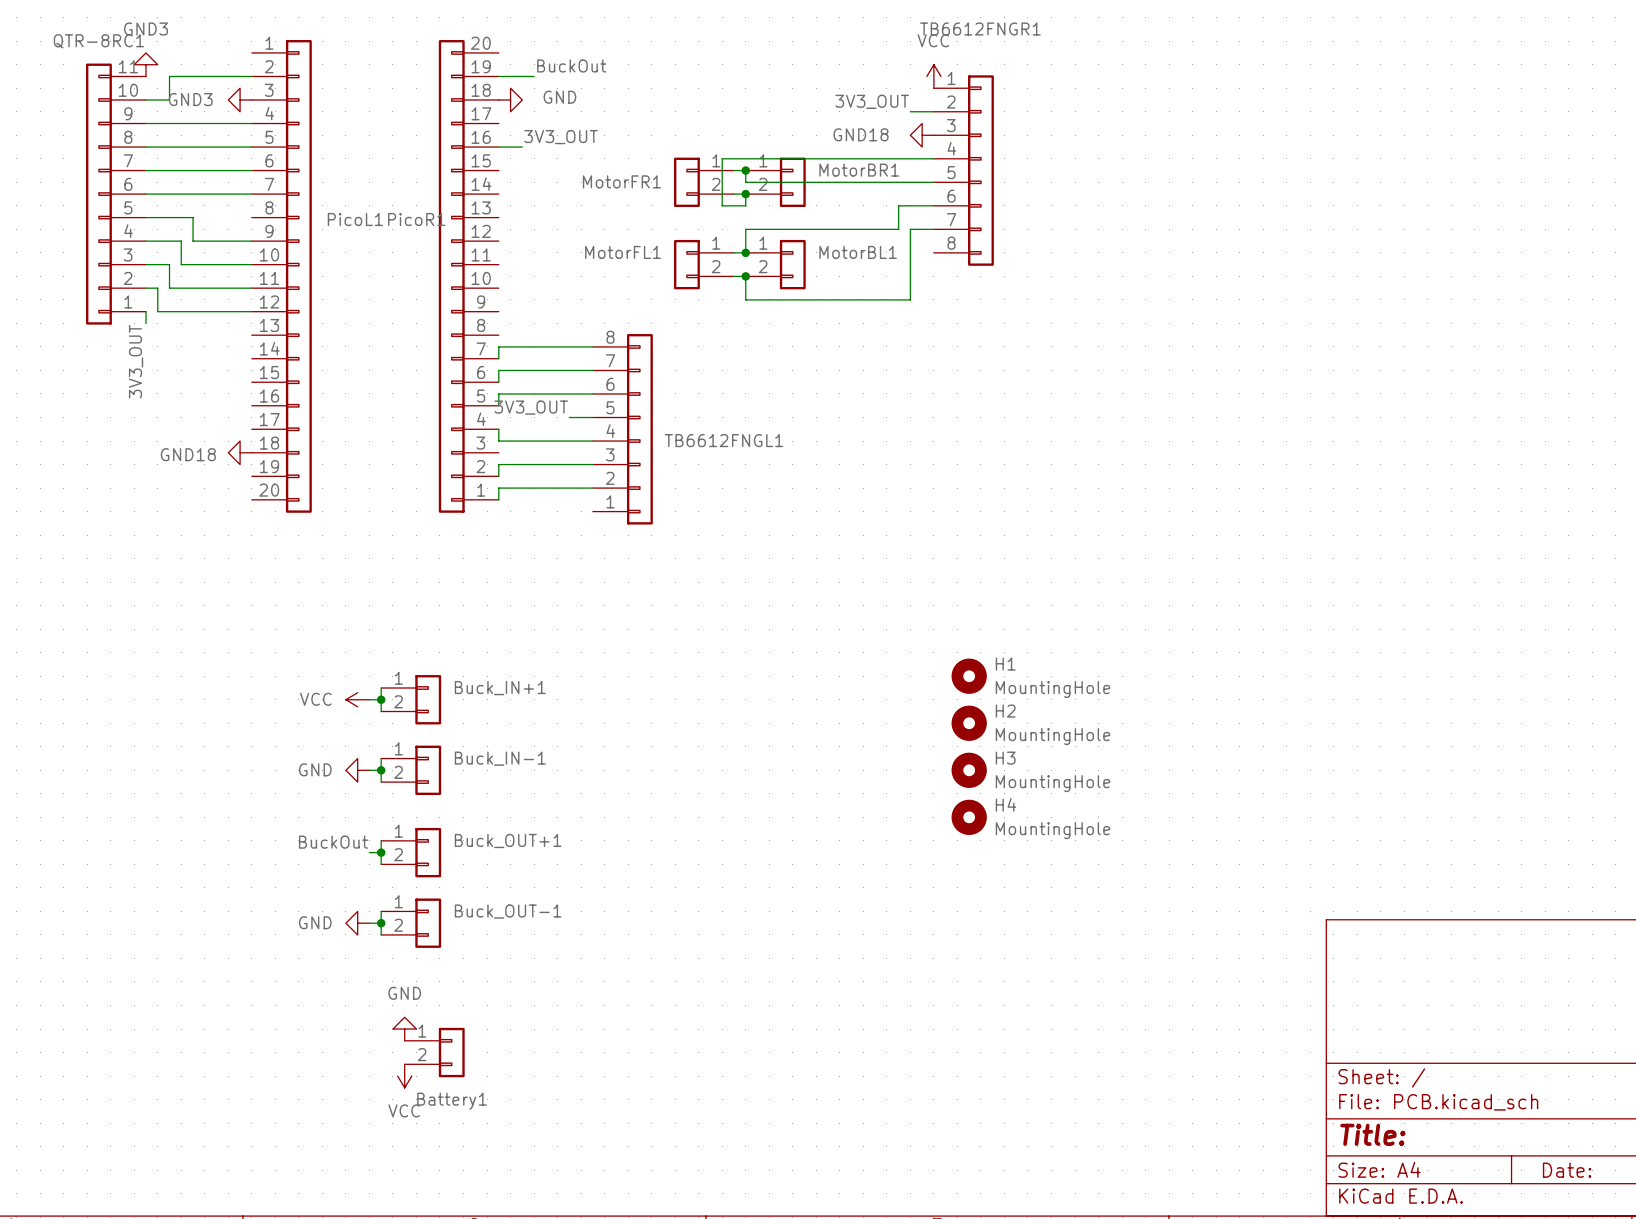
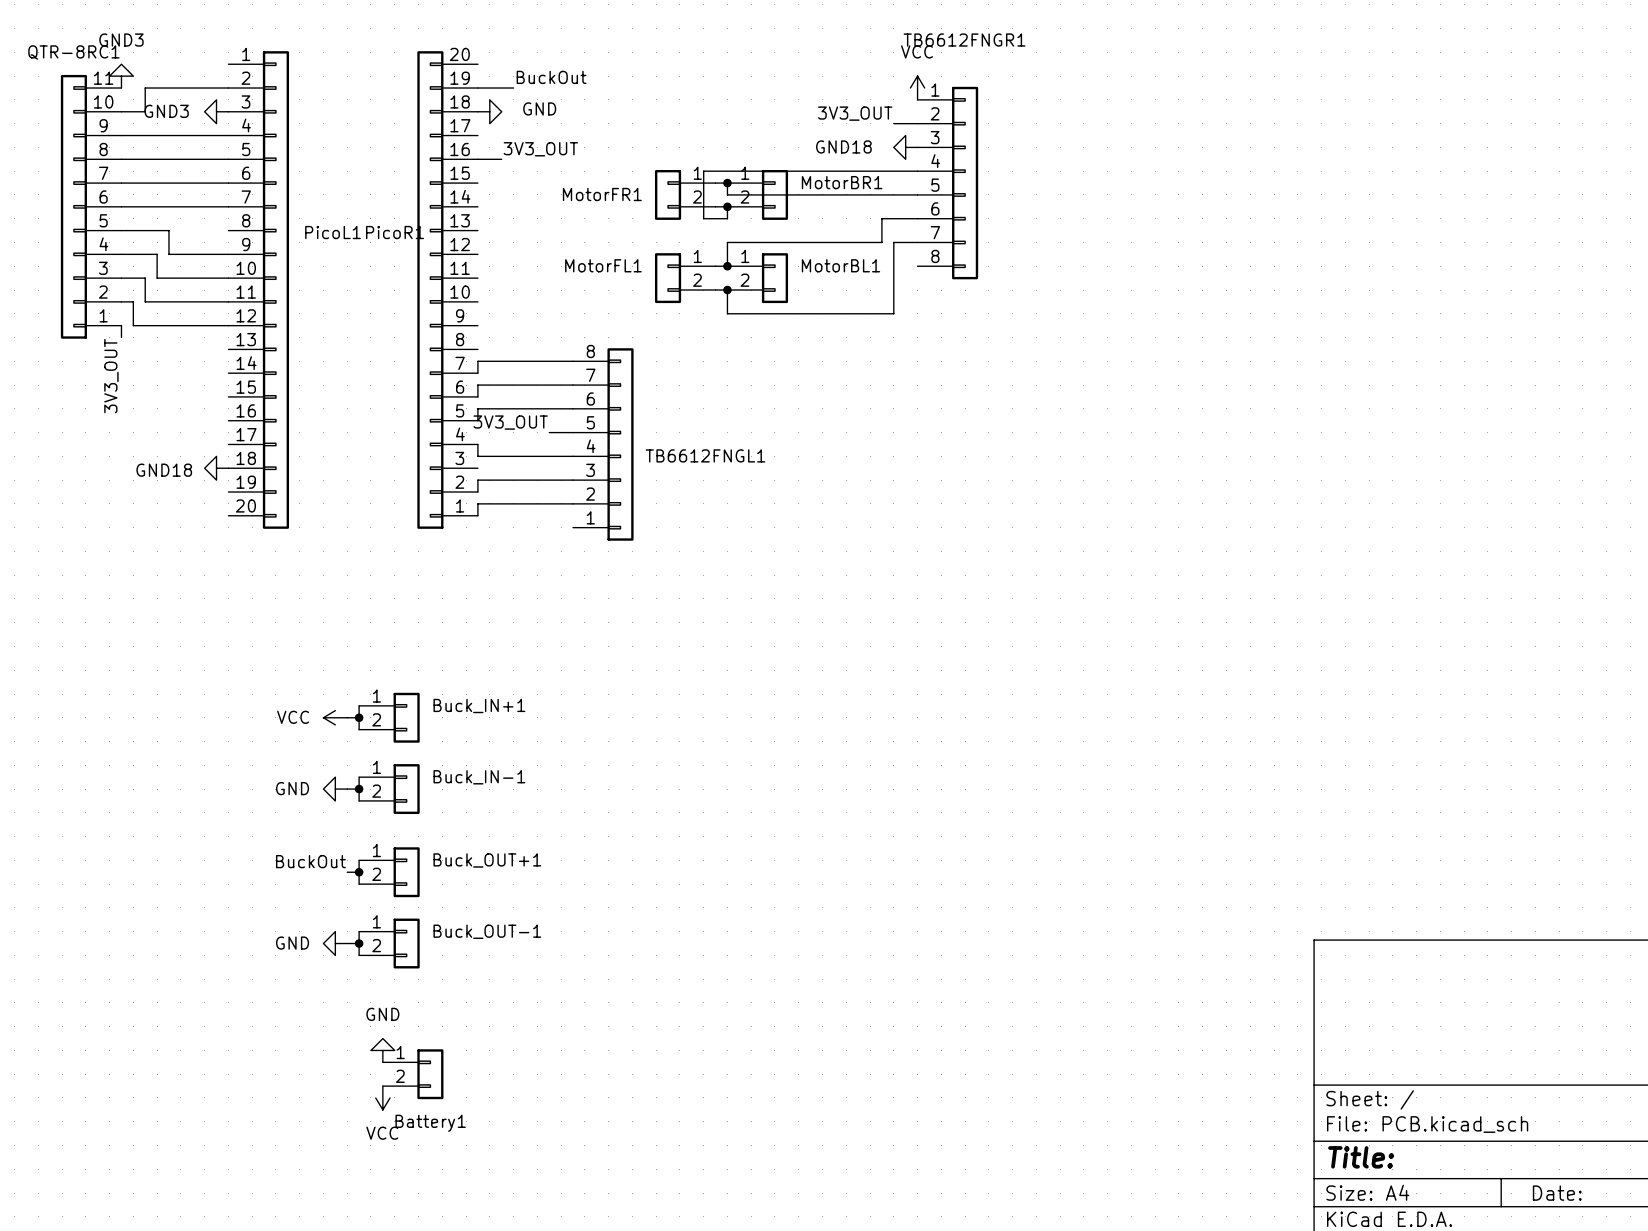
H1: MountingHole (969, 676) -> none
H2: MountingHole (969, 723) -> none
H3: MountingHole (969, 770) -> none
H4: MountingHole (969, 817) -> none

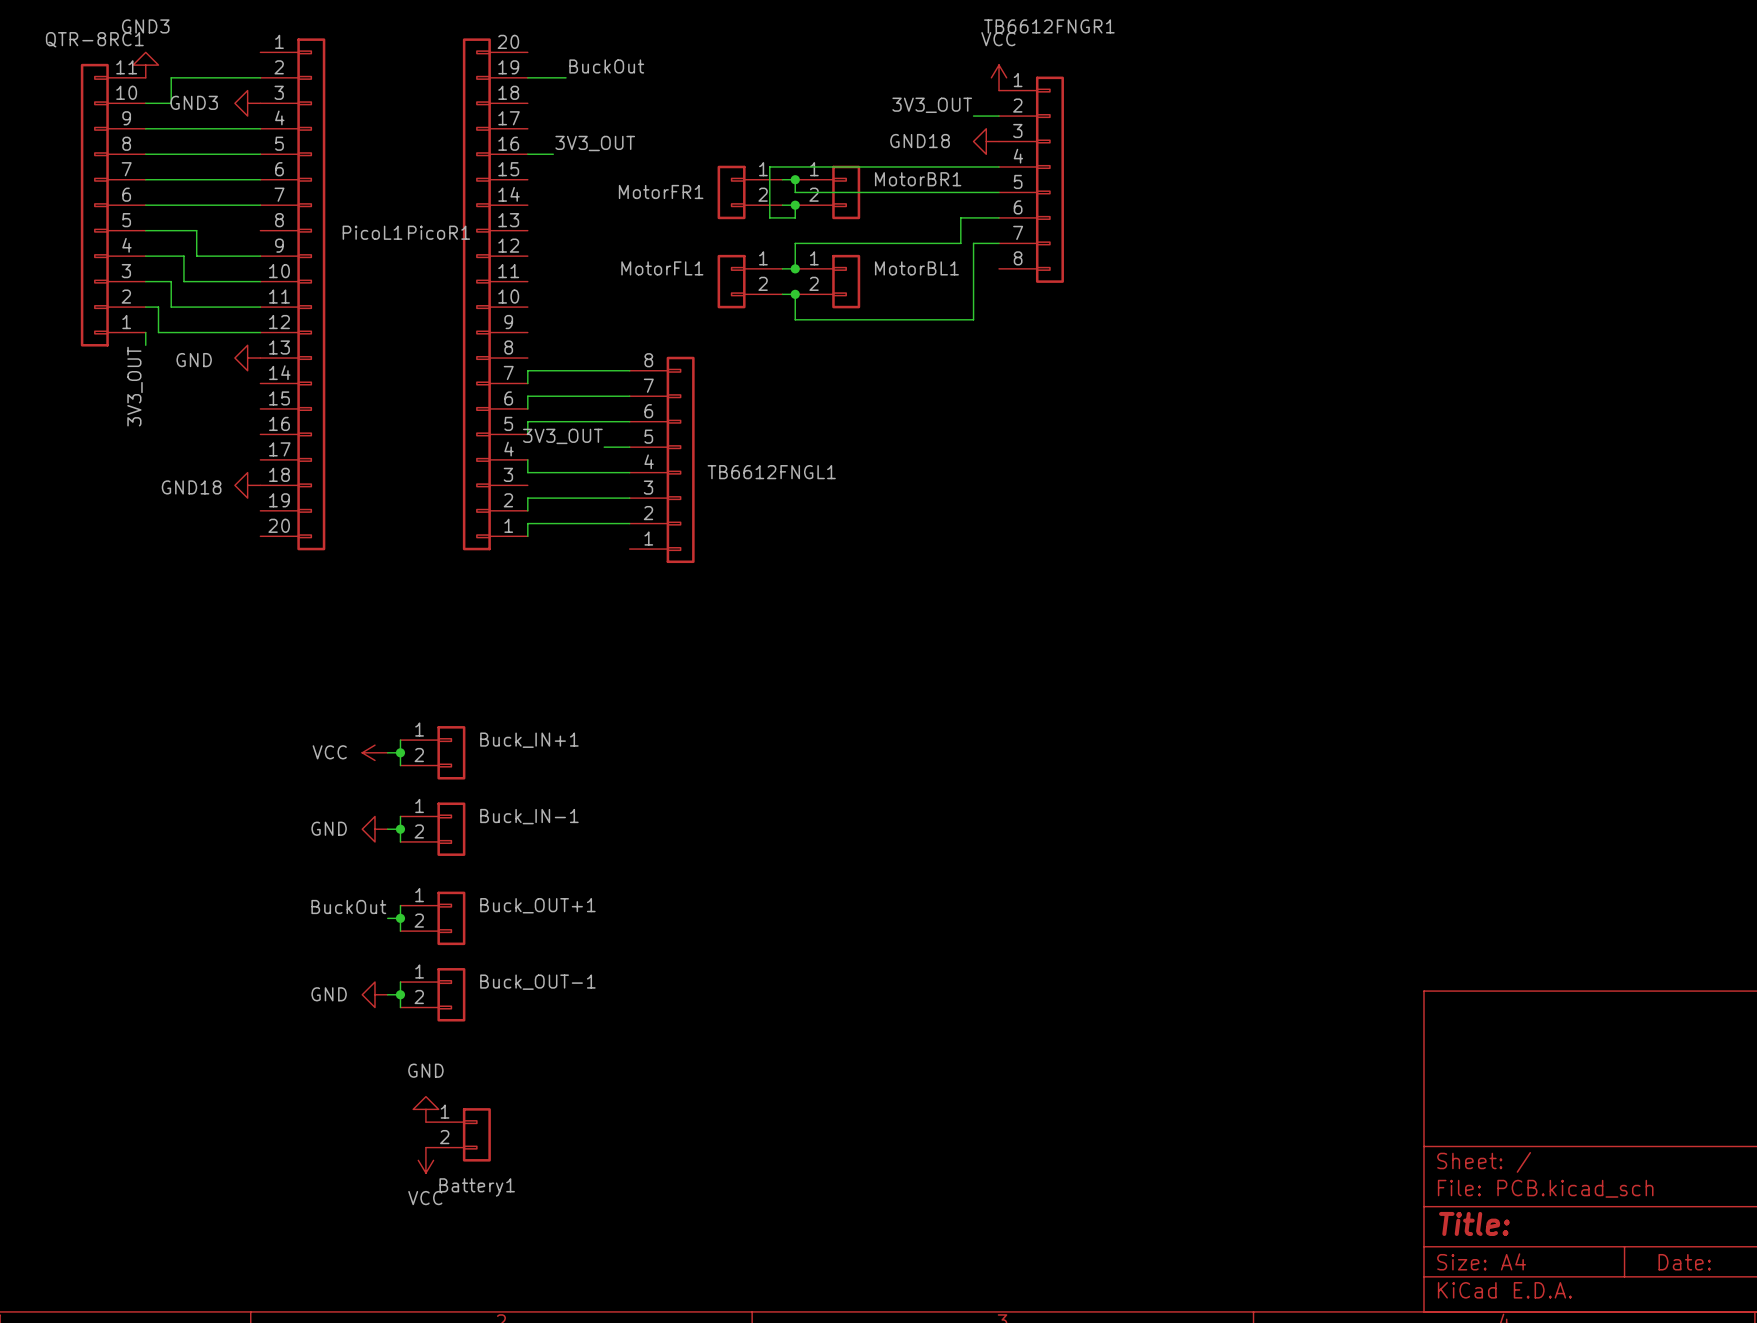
power symbol: GND (489, 111) -> none
power symbol: none -> GND (247, 358)

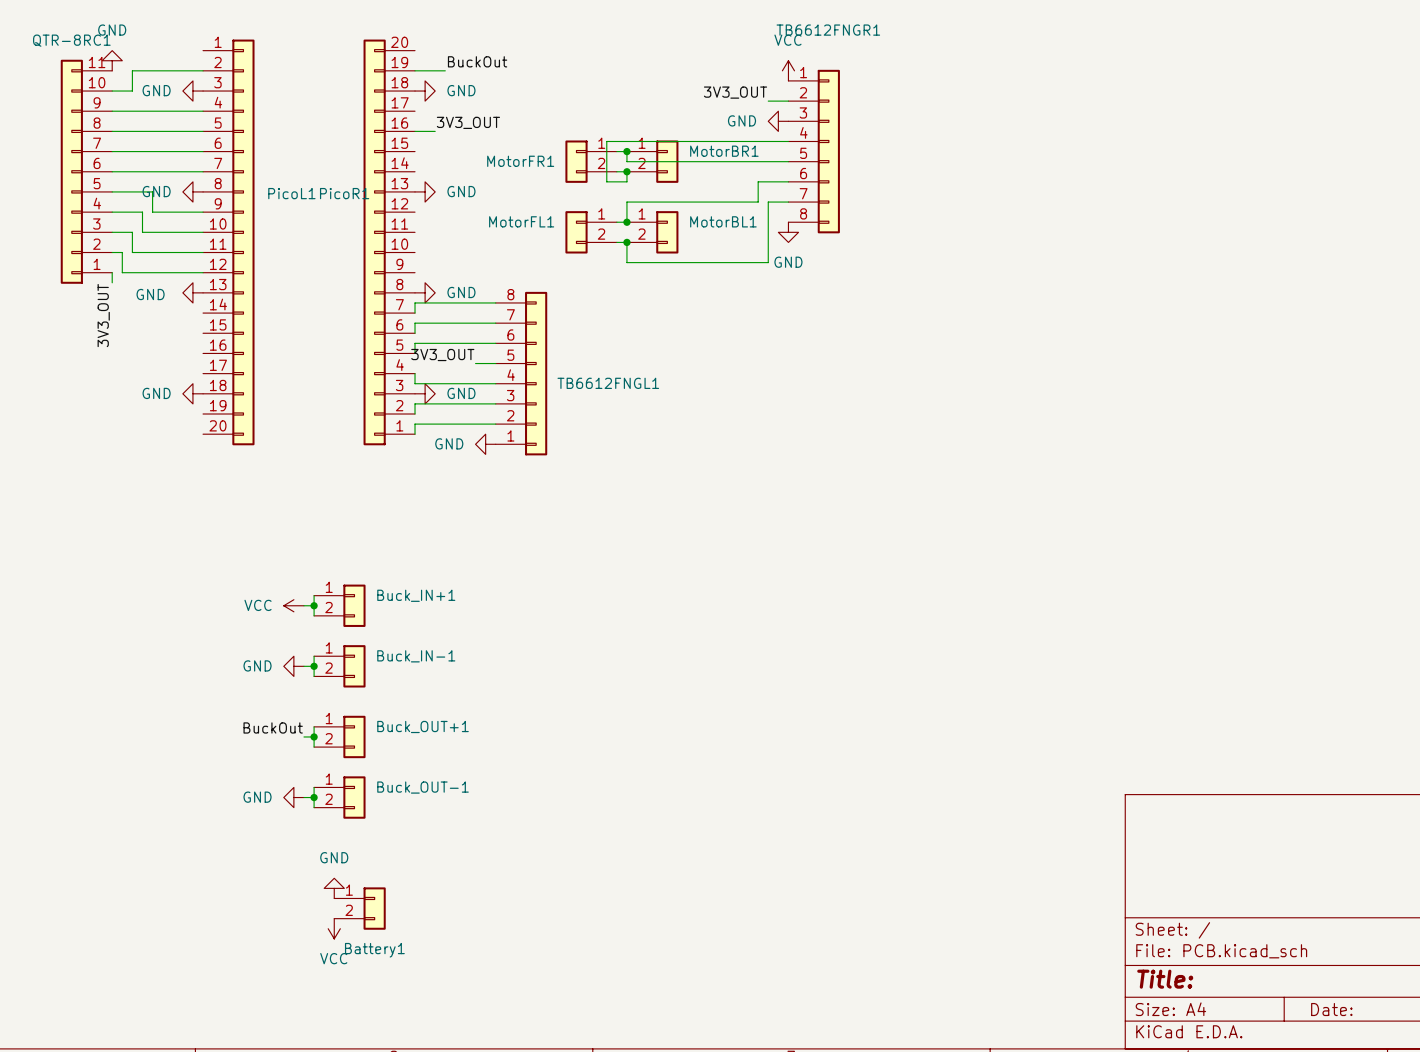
power symbol: GND3 (145, 65) -> GND (112, 60)
power symbol: GND3 (247, 103) -> GND (192, 91)
power symbol: none -> GND (425, 91)
power symbol: GND18 (986, 141) -> GND (778, 121)
power symbol: none -> GND (192, 191)
power symbol: none -> GND (425, 191)
power symbol: none -> GND (788, 232)
power symbol: none -> GND (425, 292)
power symbol: GND18 (247, 485) -> GND (192, 393)
power symbol: none -> GND (425, 393)
power symbol: none -> GND (485, 444)

